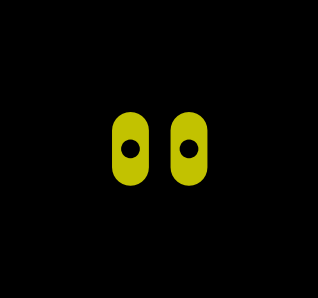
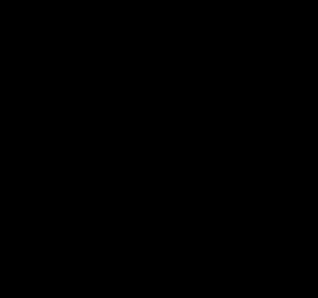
part: (159, 148) -> none

